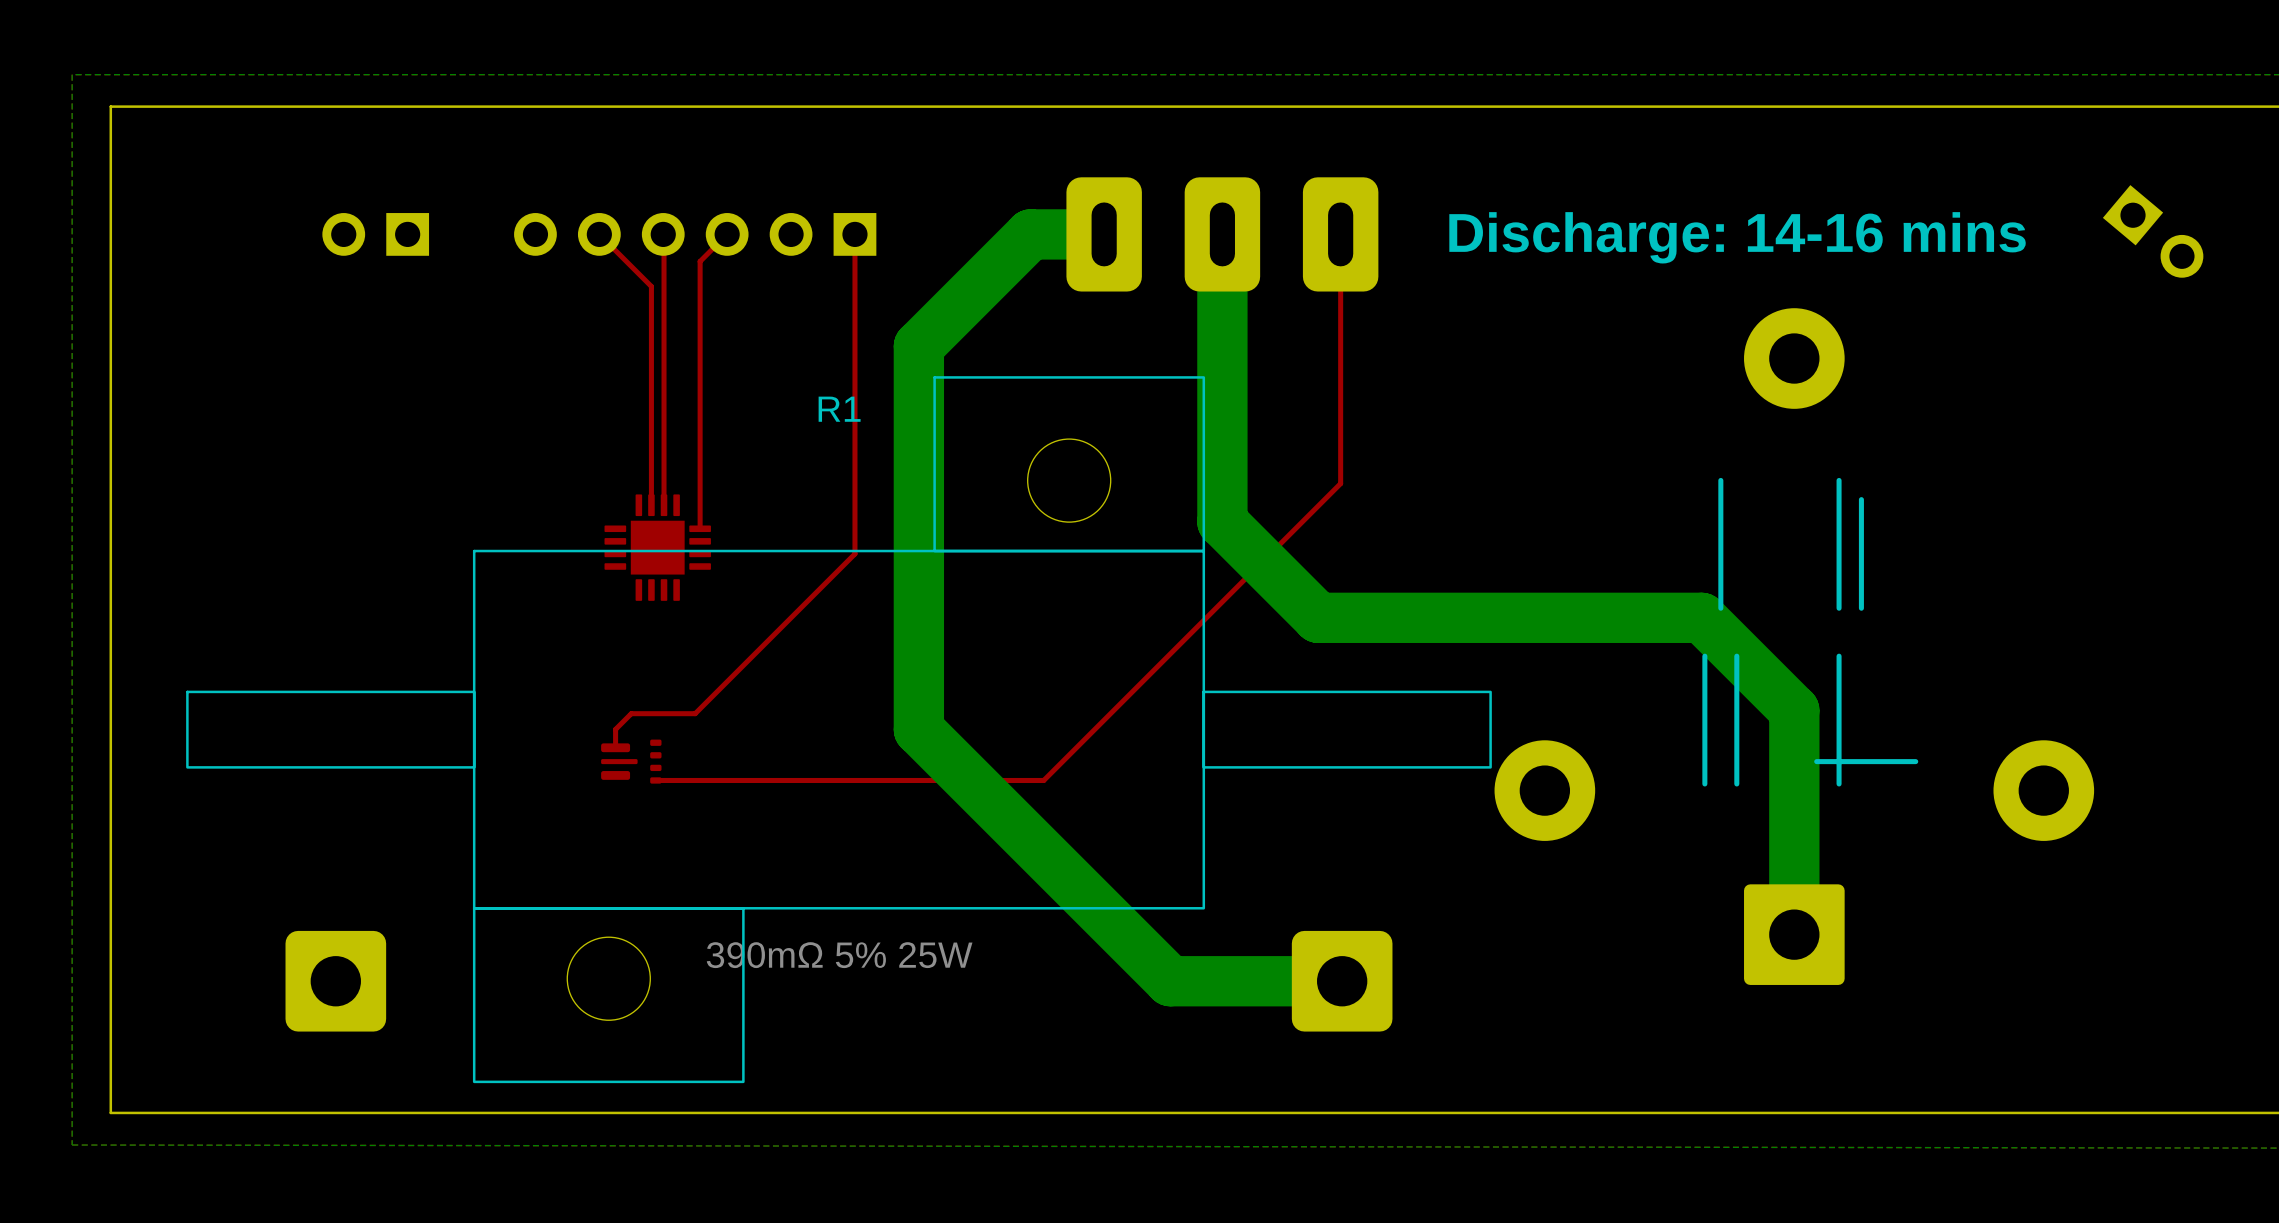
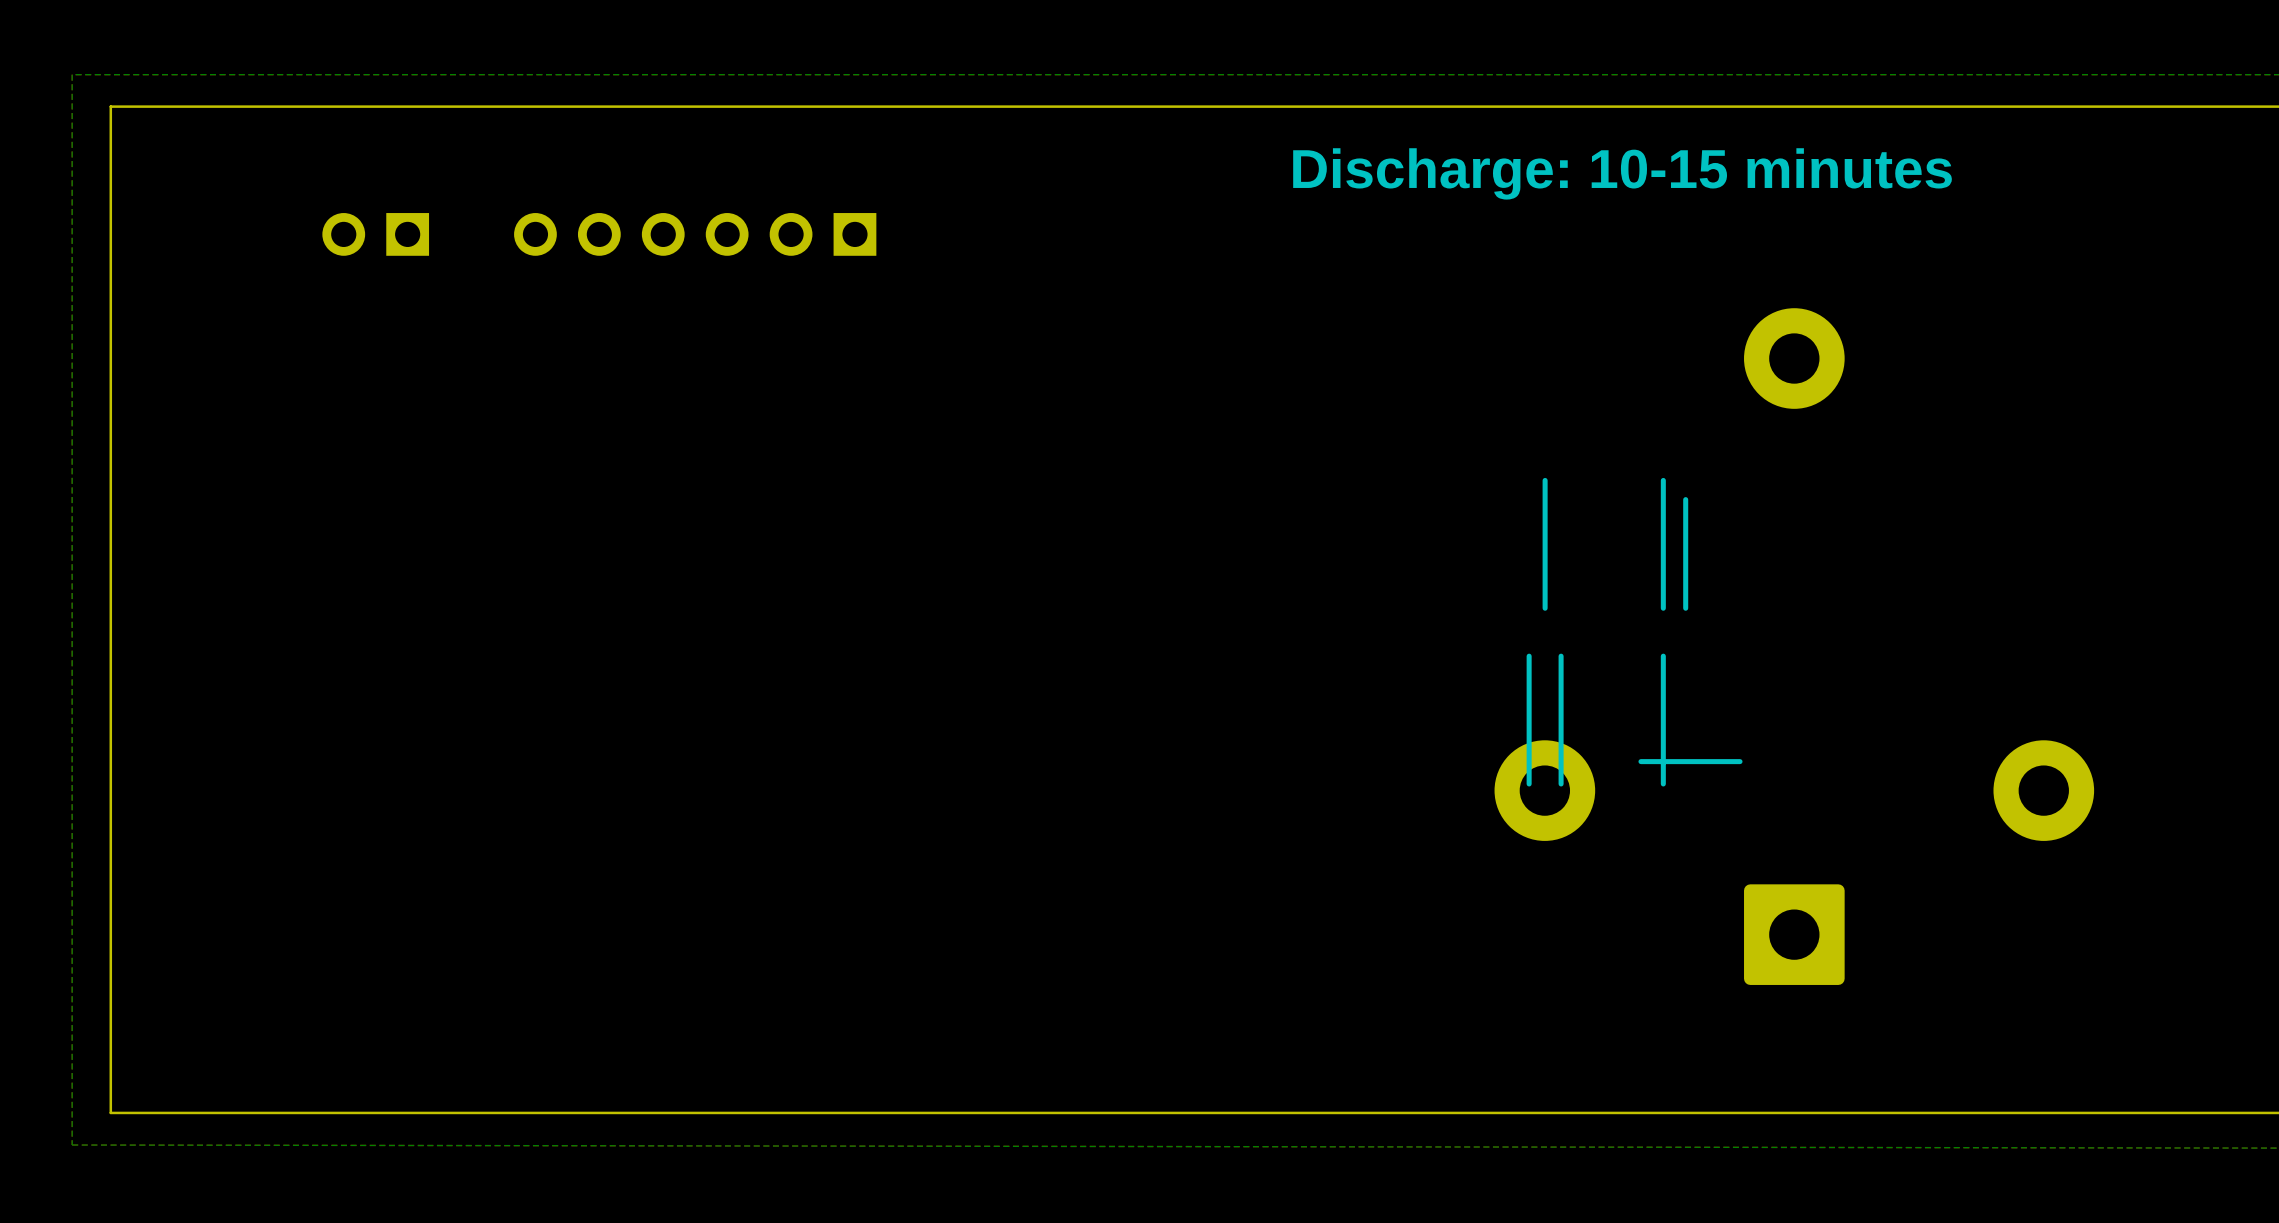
part: (2153, 231) -> none
top track: (599, 234) (651, 286) (651, 505) -> none
top track: (727, 234) (700, 261) (700, 528) -> none
top track: (854, 234) (854, 553) (695, 713) (631, 713) (615, 729) (615, 747) -> none
bottom track: (1104, 234) (1030, 234) (918, 346) (918, 729) (1170, 981) (1342, 981) -> none
bottom track: (1222, 234) (1222, 521) (1318, 617) (1701, 617) (1794, 710) (1794, 934) -> none
part: (1222, 234) -> none
top track: (1340, 234) (1340, 483) (1043, 780) (655, 780) -> none
top track: (664, 235) (664, 505) -> none
text: Discharge: 14-16 mins (1737, 237) -> Discharge: 10-15 minutes (1622, 173)
line: (1720, 480) (1720, 608) -> (1545, 480) (1545, 608)
line: (1839, 480) (1839, 608) -> (1663, 480) (1663, 608)
line: (1861, 499) (1861, 608) -> (1685, 499) (1685, 608)
part: (657, 547) -> none
line: (1704, 656) (1704, 783) -> (1529, 656) (1529, 783)
line: (1736, 656) (1736, 783) -> (1561, 656) (1561, 783)
line: (1839, 656) (1839, 783) -> (1663, 656) (1663, 783)
R1: 390mΩ 5% 25W (838, 729) -> none
part: (631, 761) -> none
line: (1915, 761) (1816, 761) -> (1740, 761) (1640, 761)

